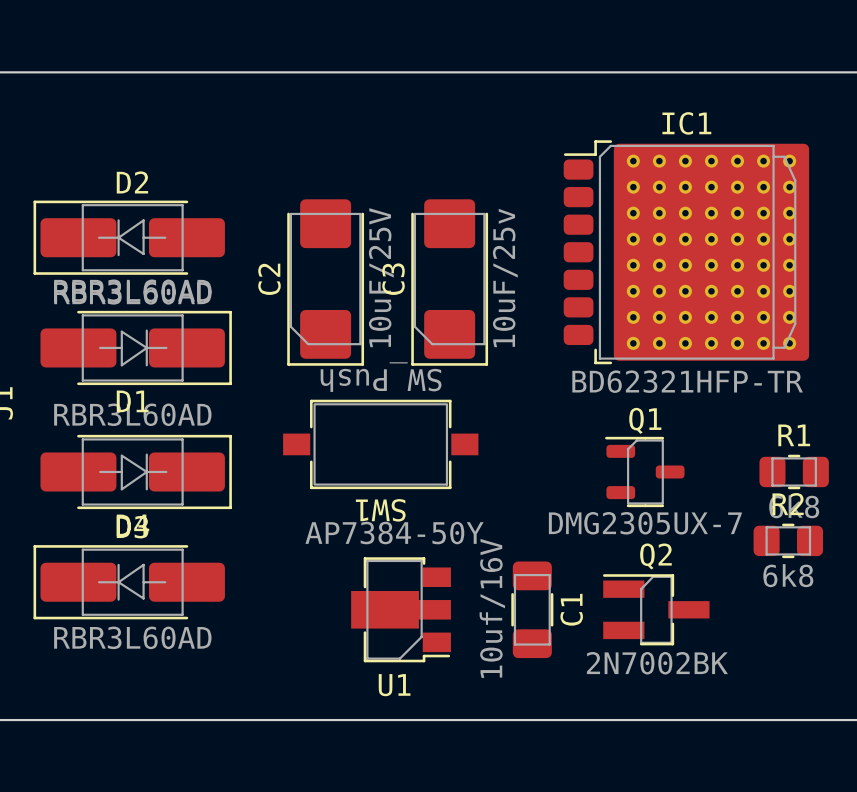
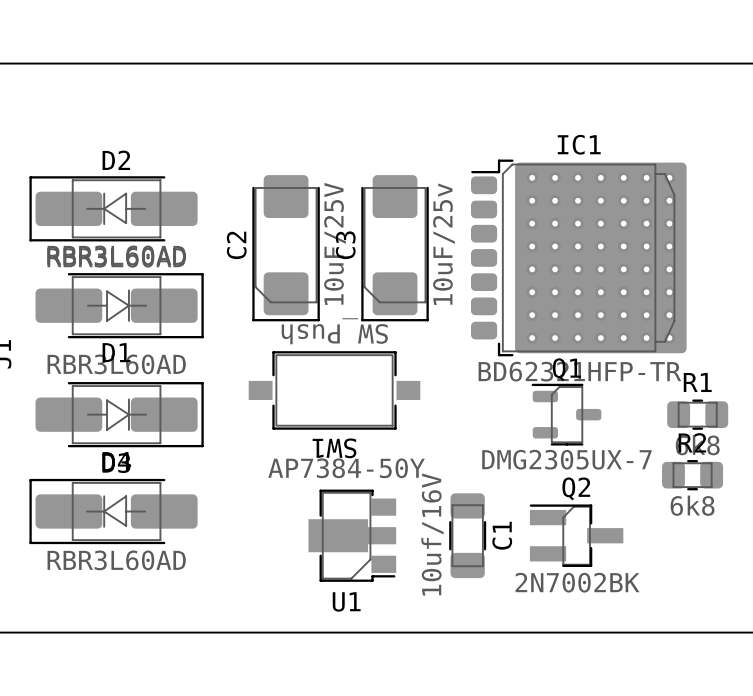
IC1 position: (686, 252) -> (578, 257)

